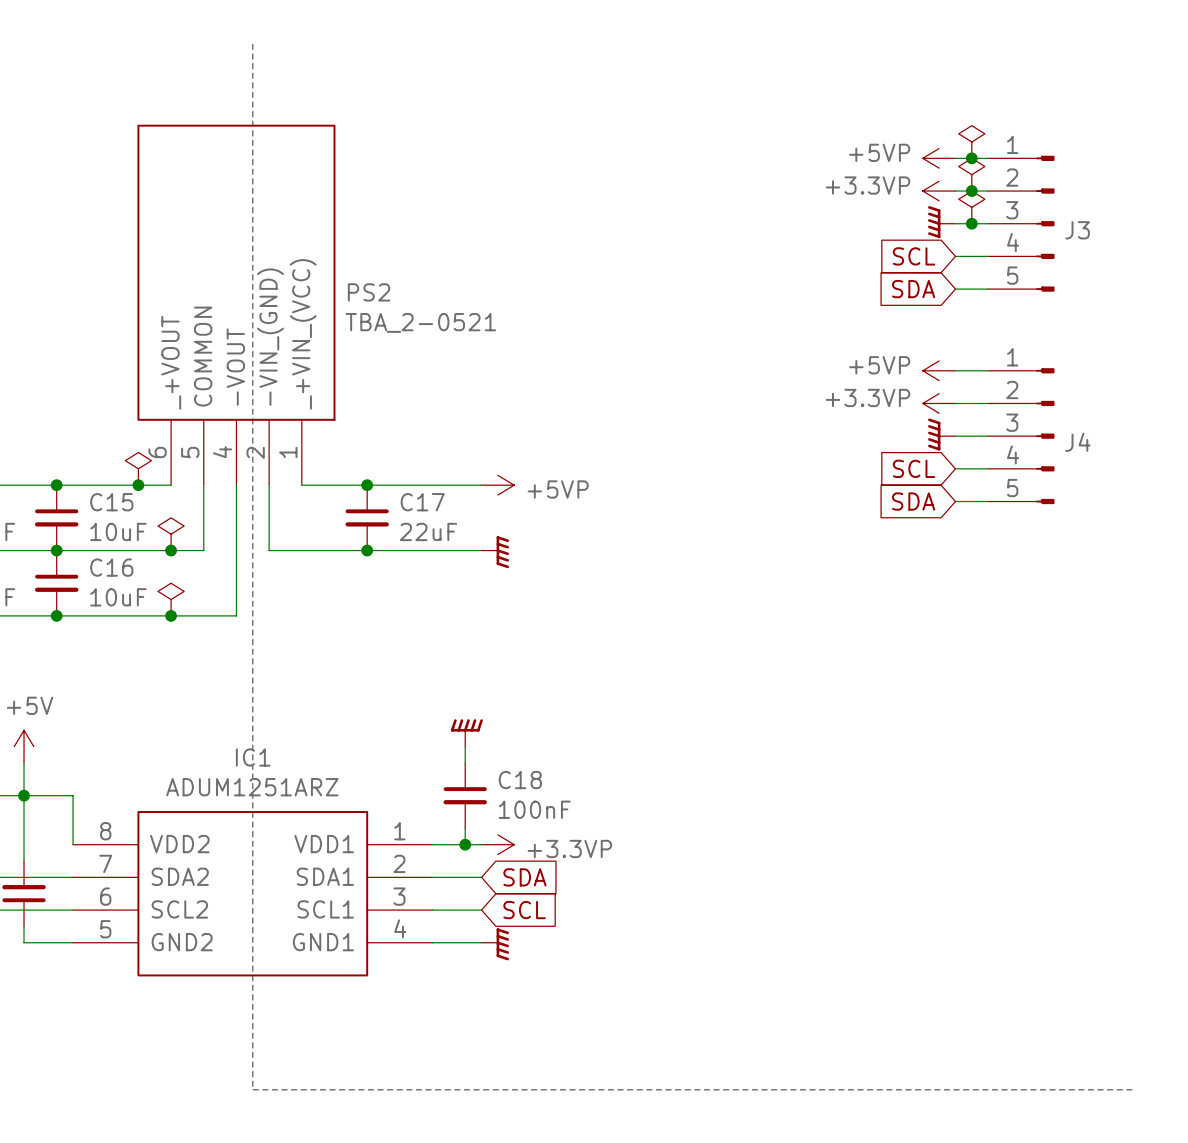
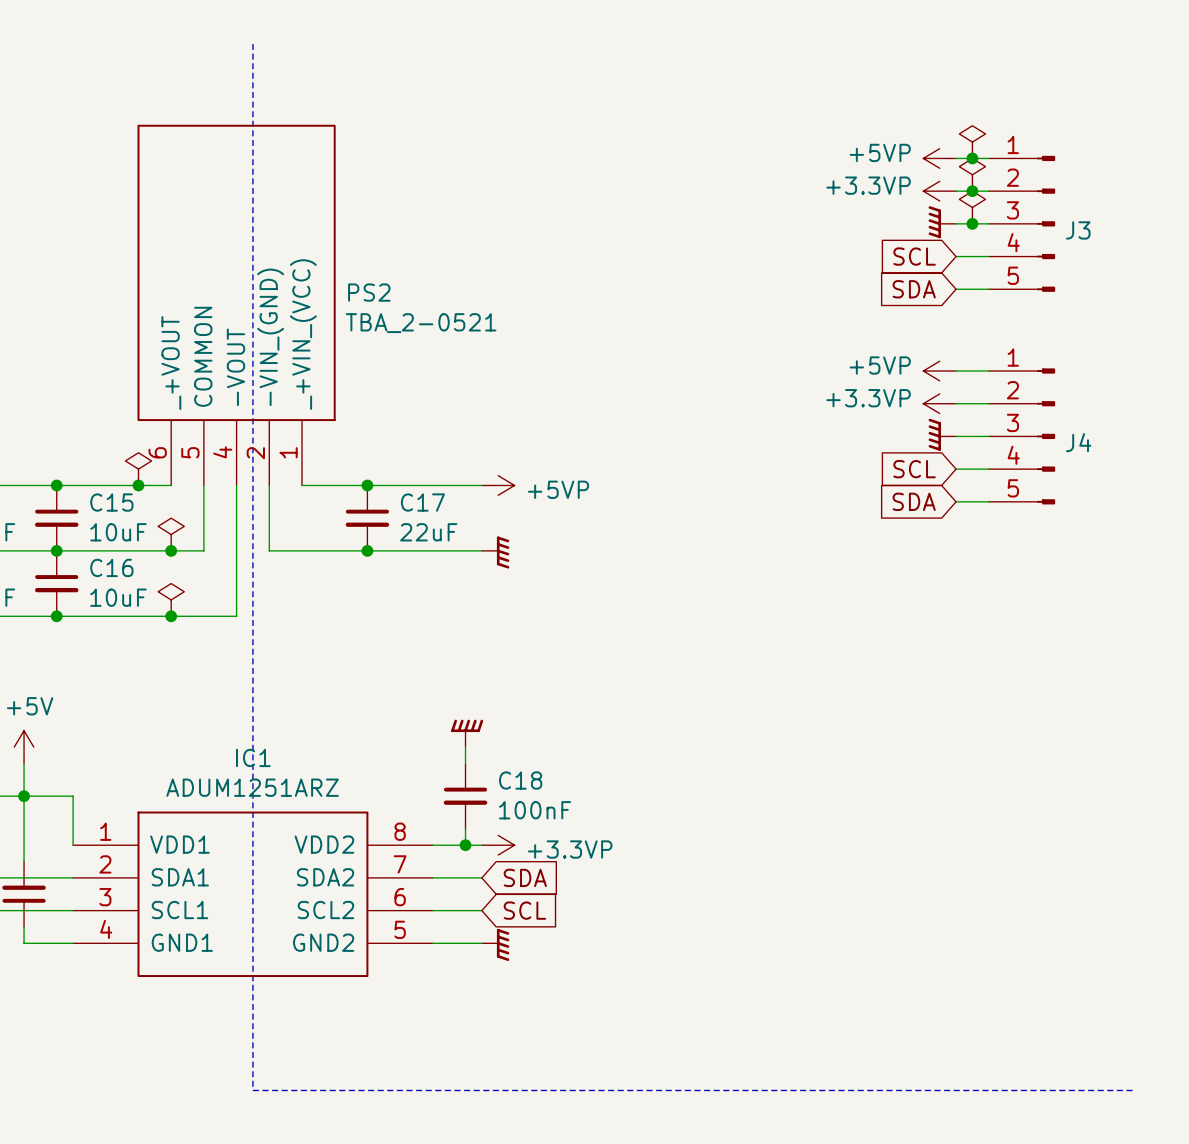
IC1 flip: as is (252, 893) -> left-right (252, 894)

